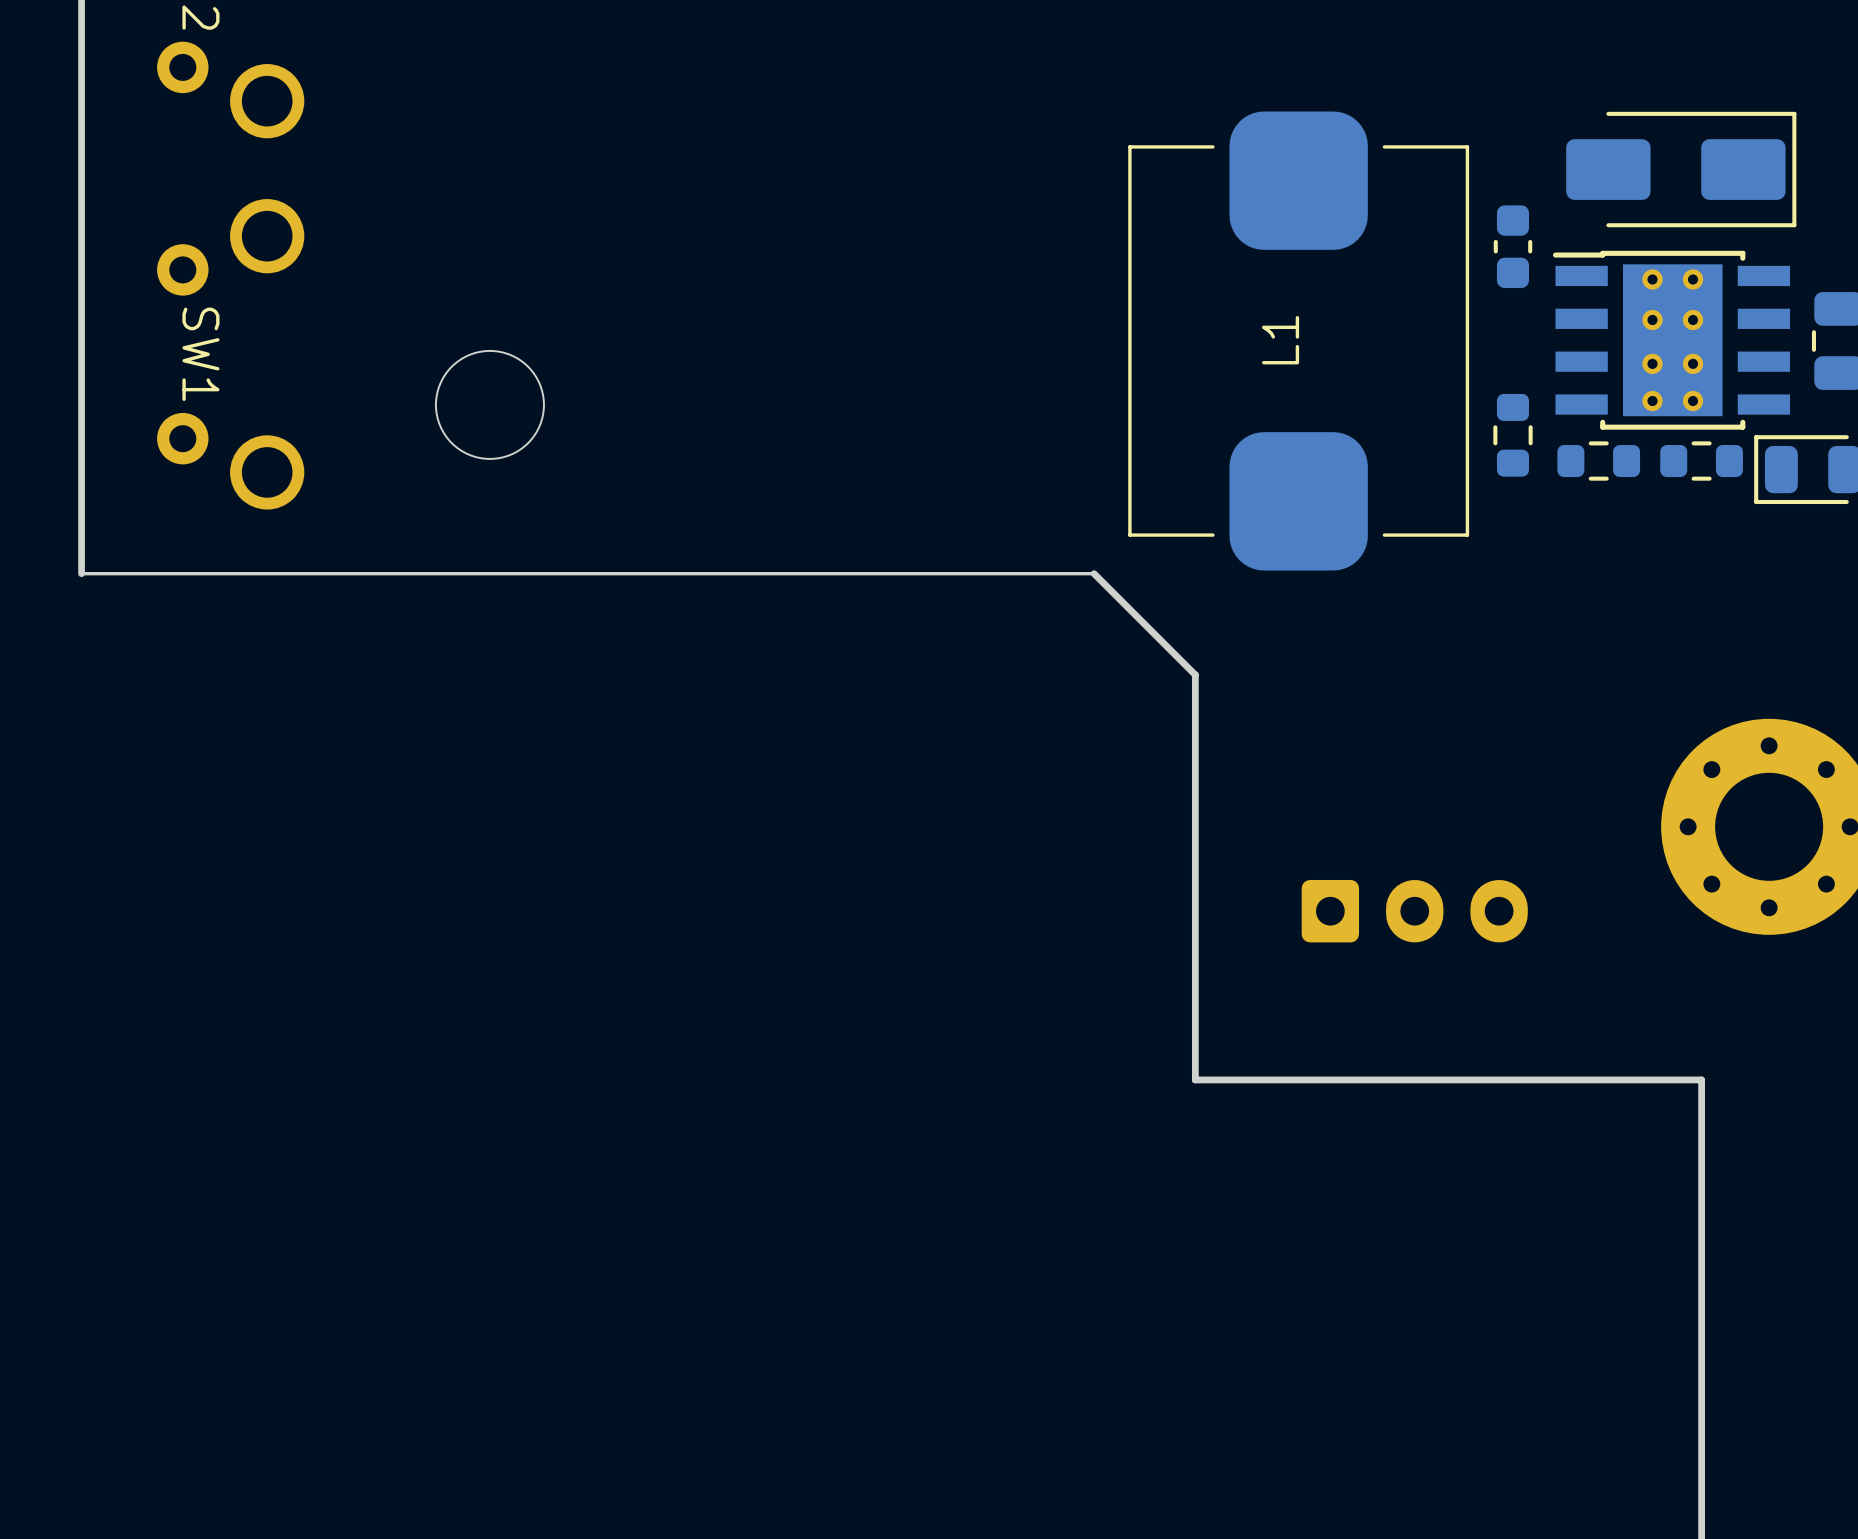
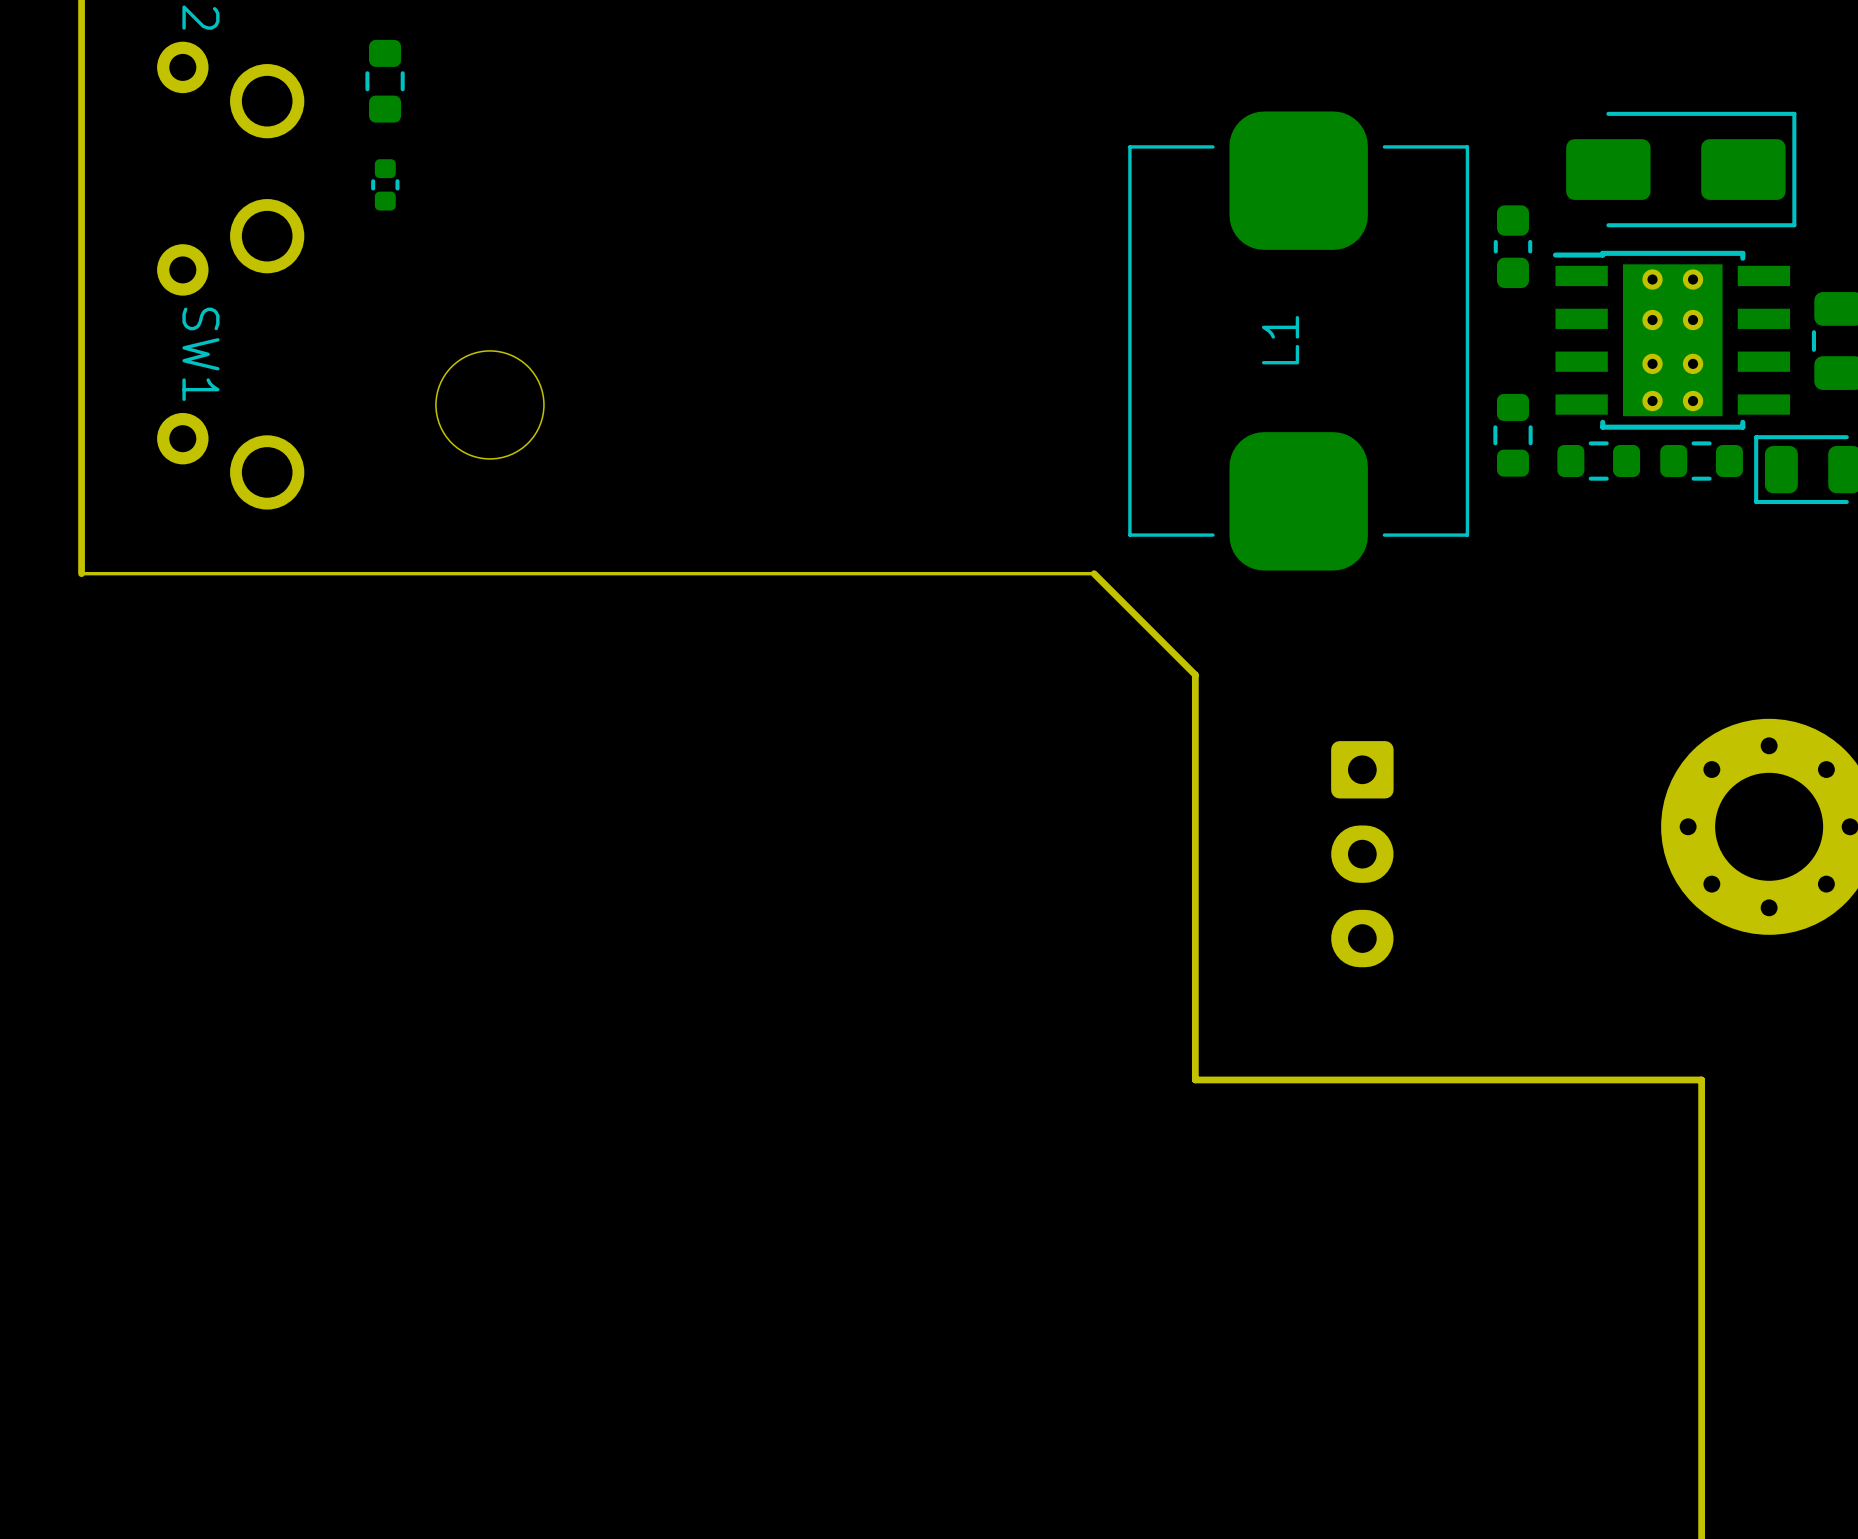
part: none -> (385, 81)
part: none -> (385, 184)
part rotation: 0° (1414, 911) -> 90° clockwise (1362, 854)

